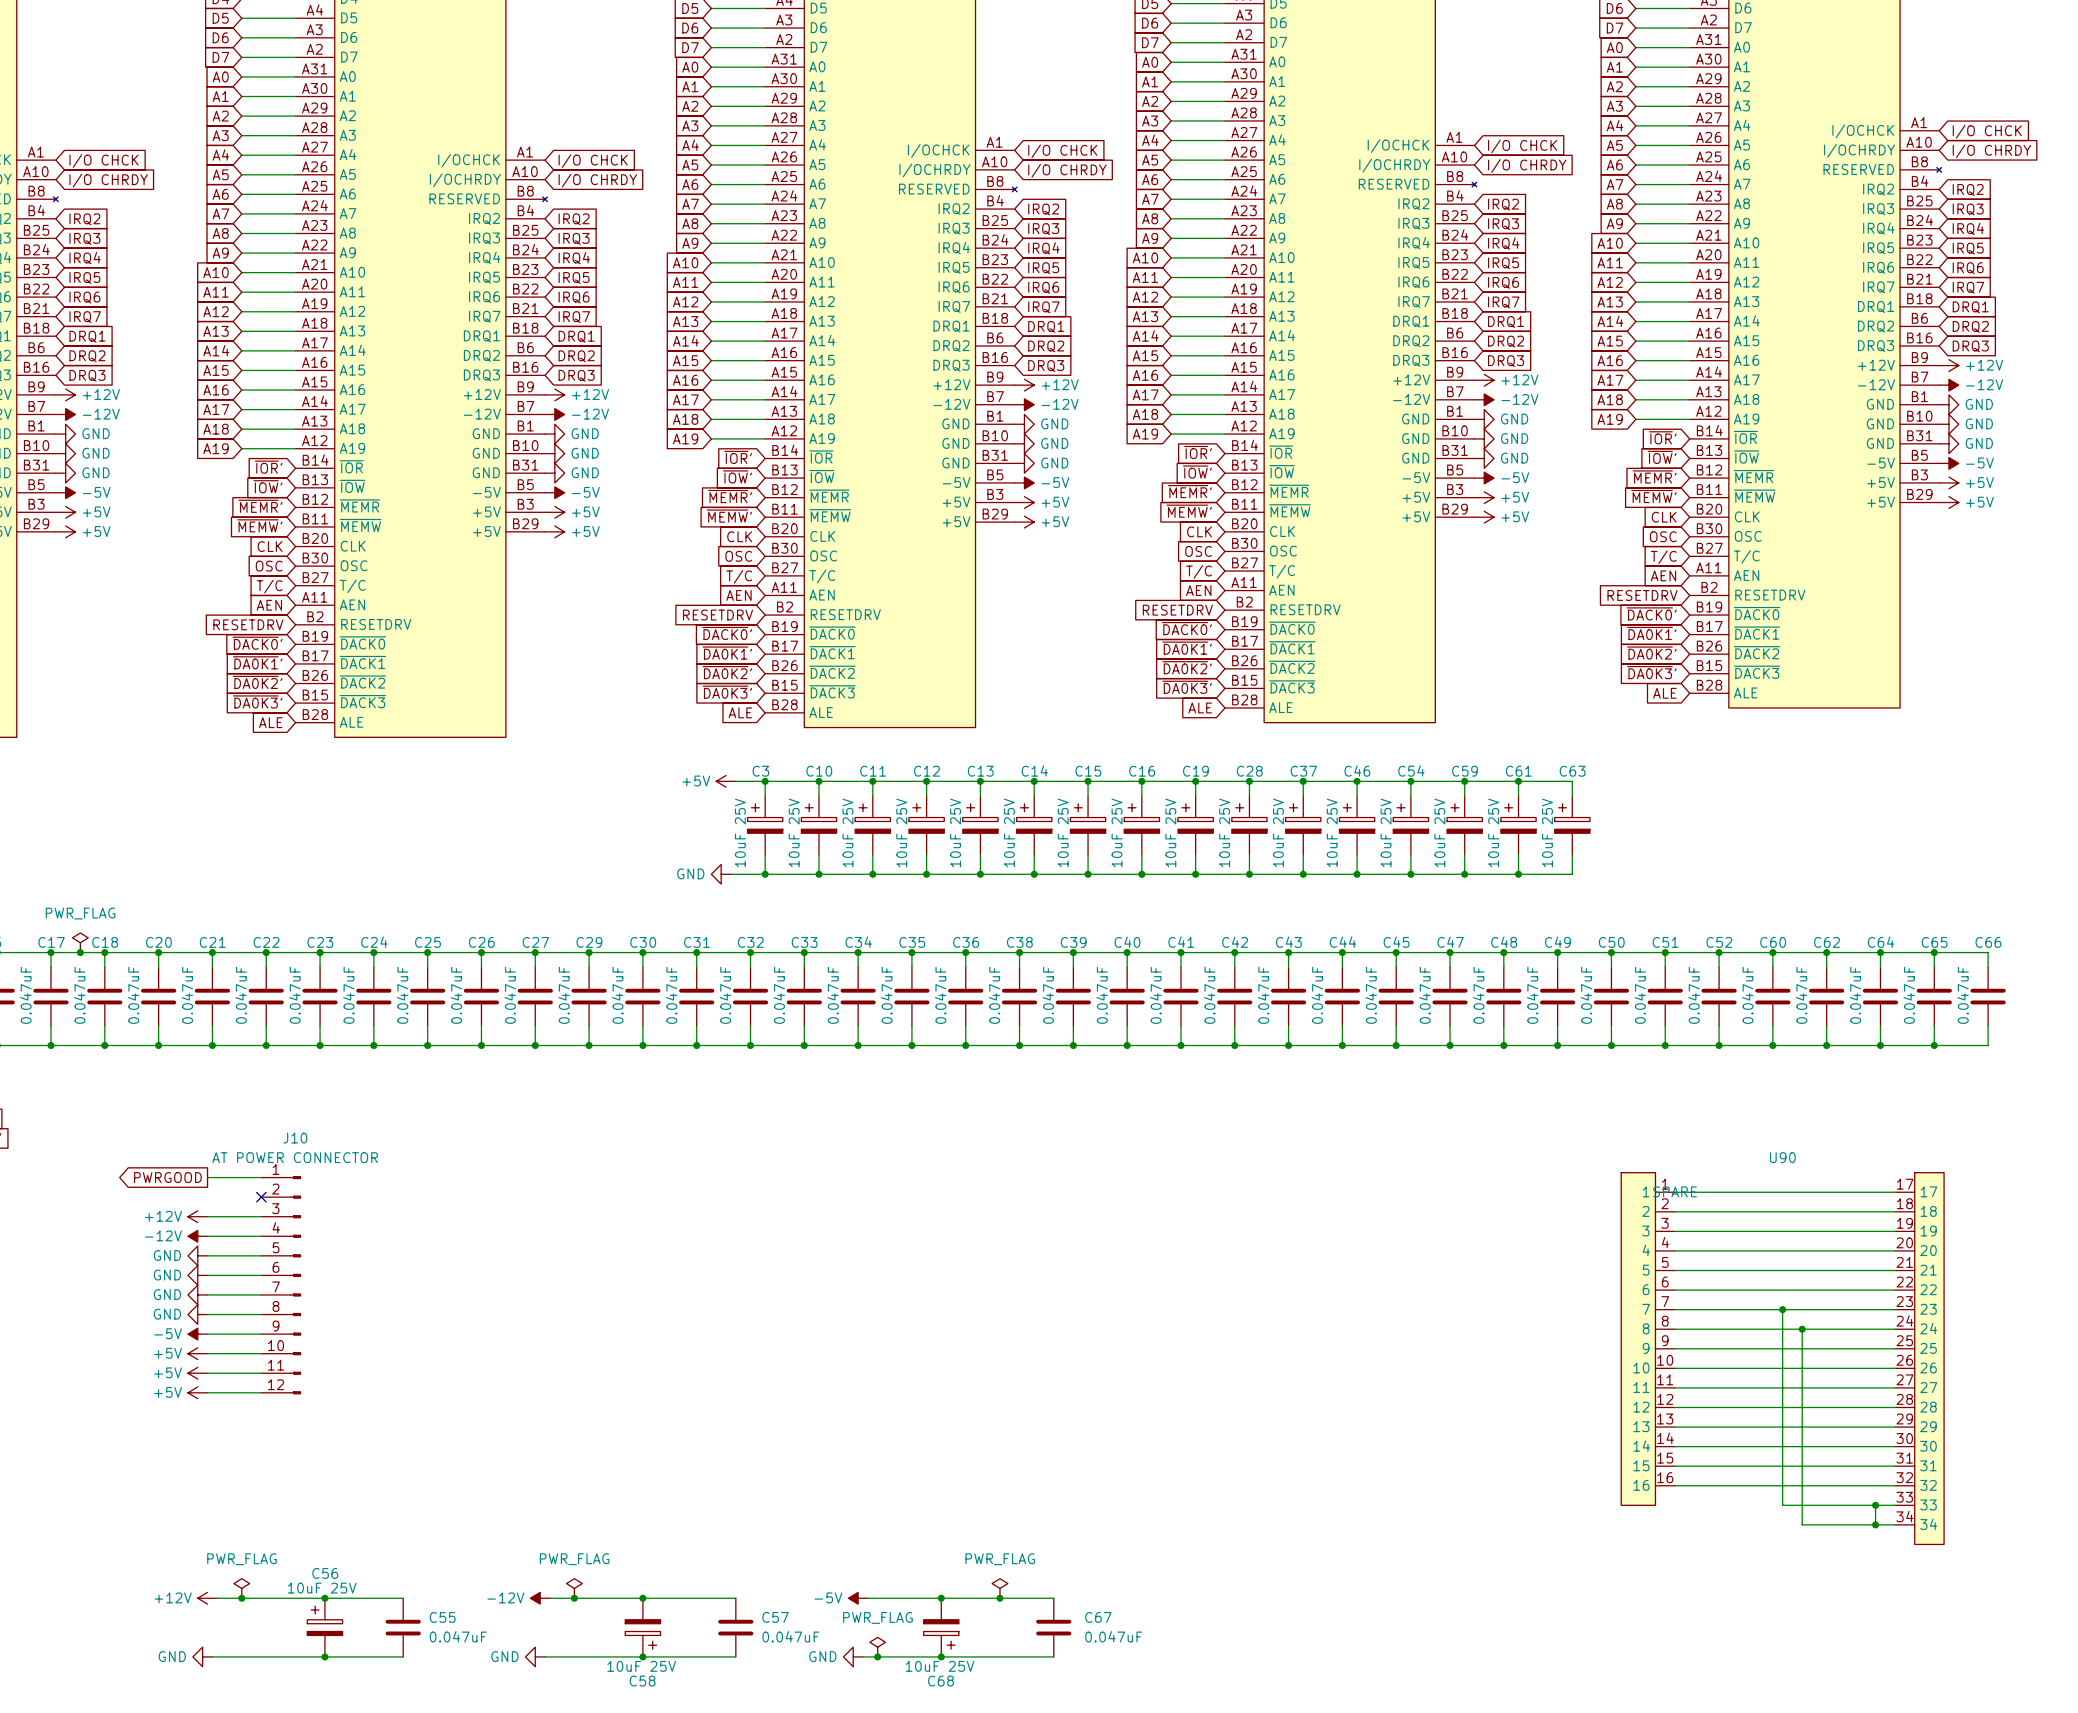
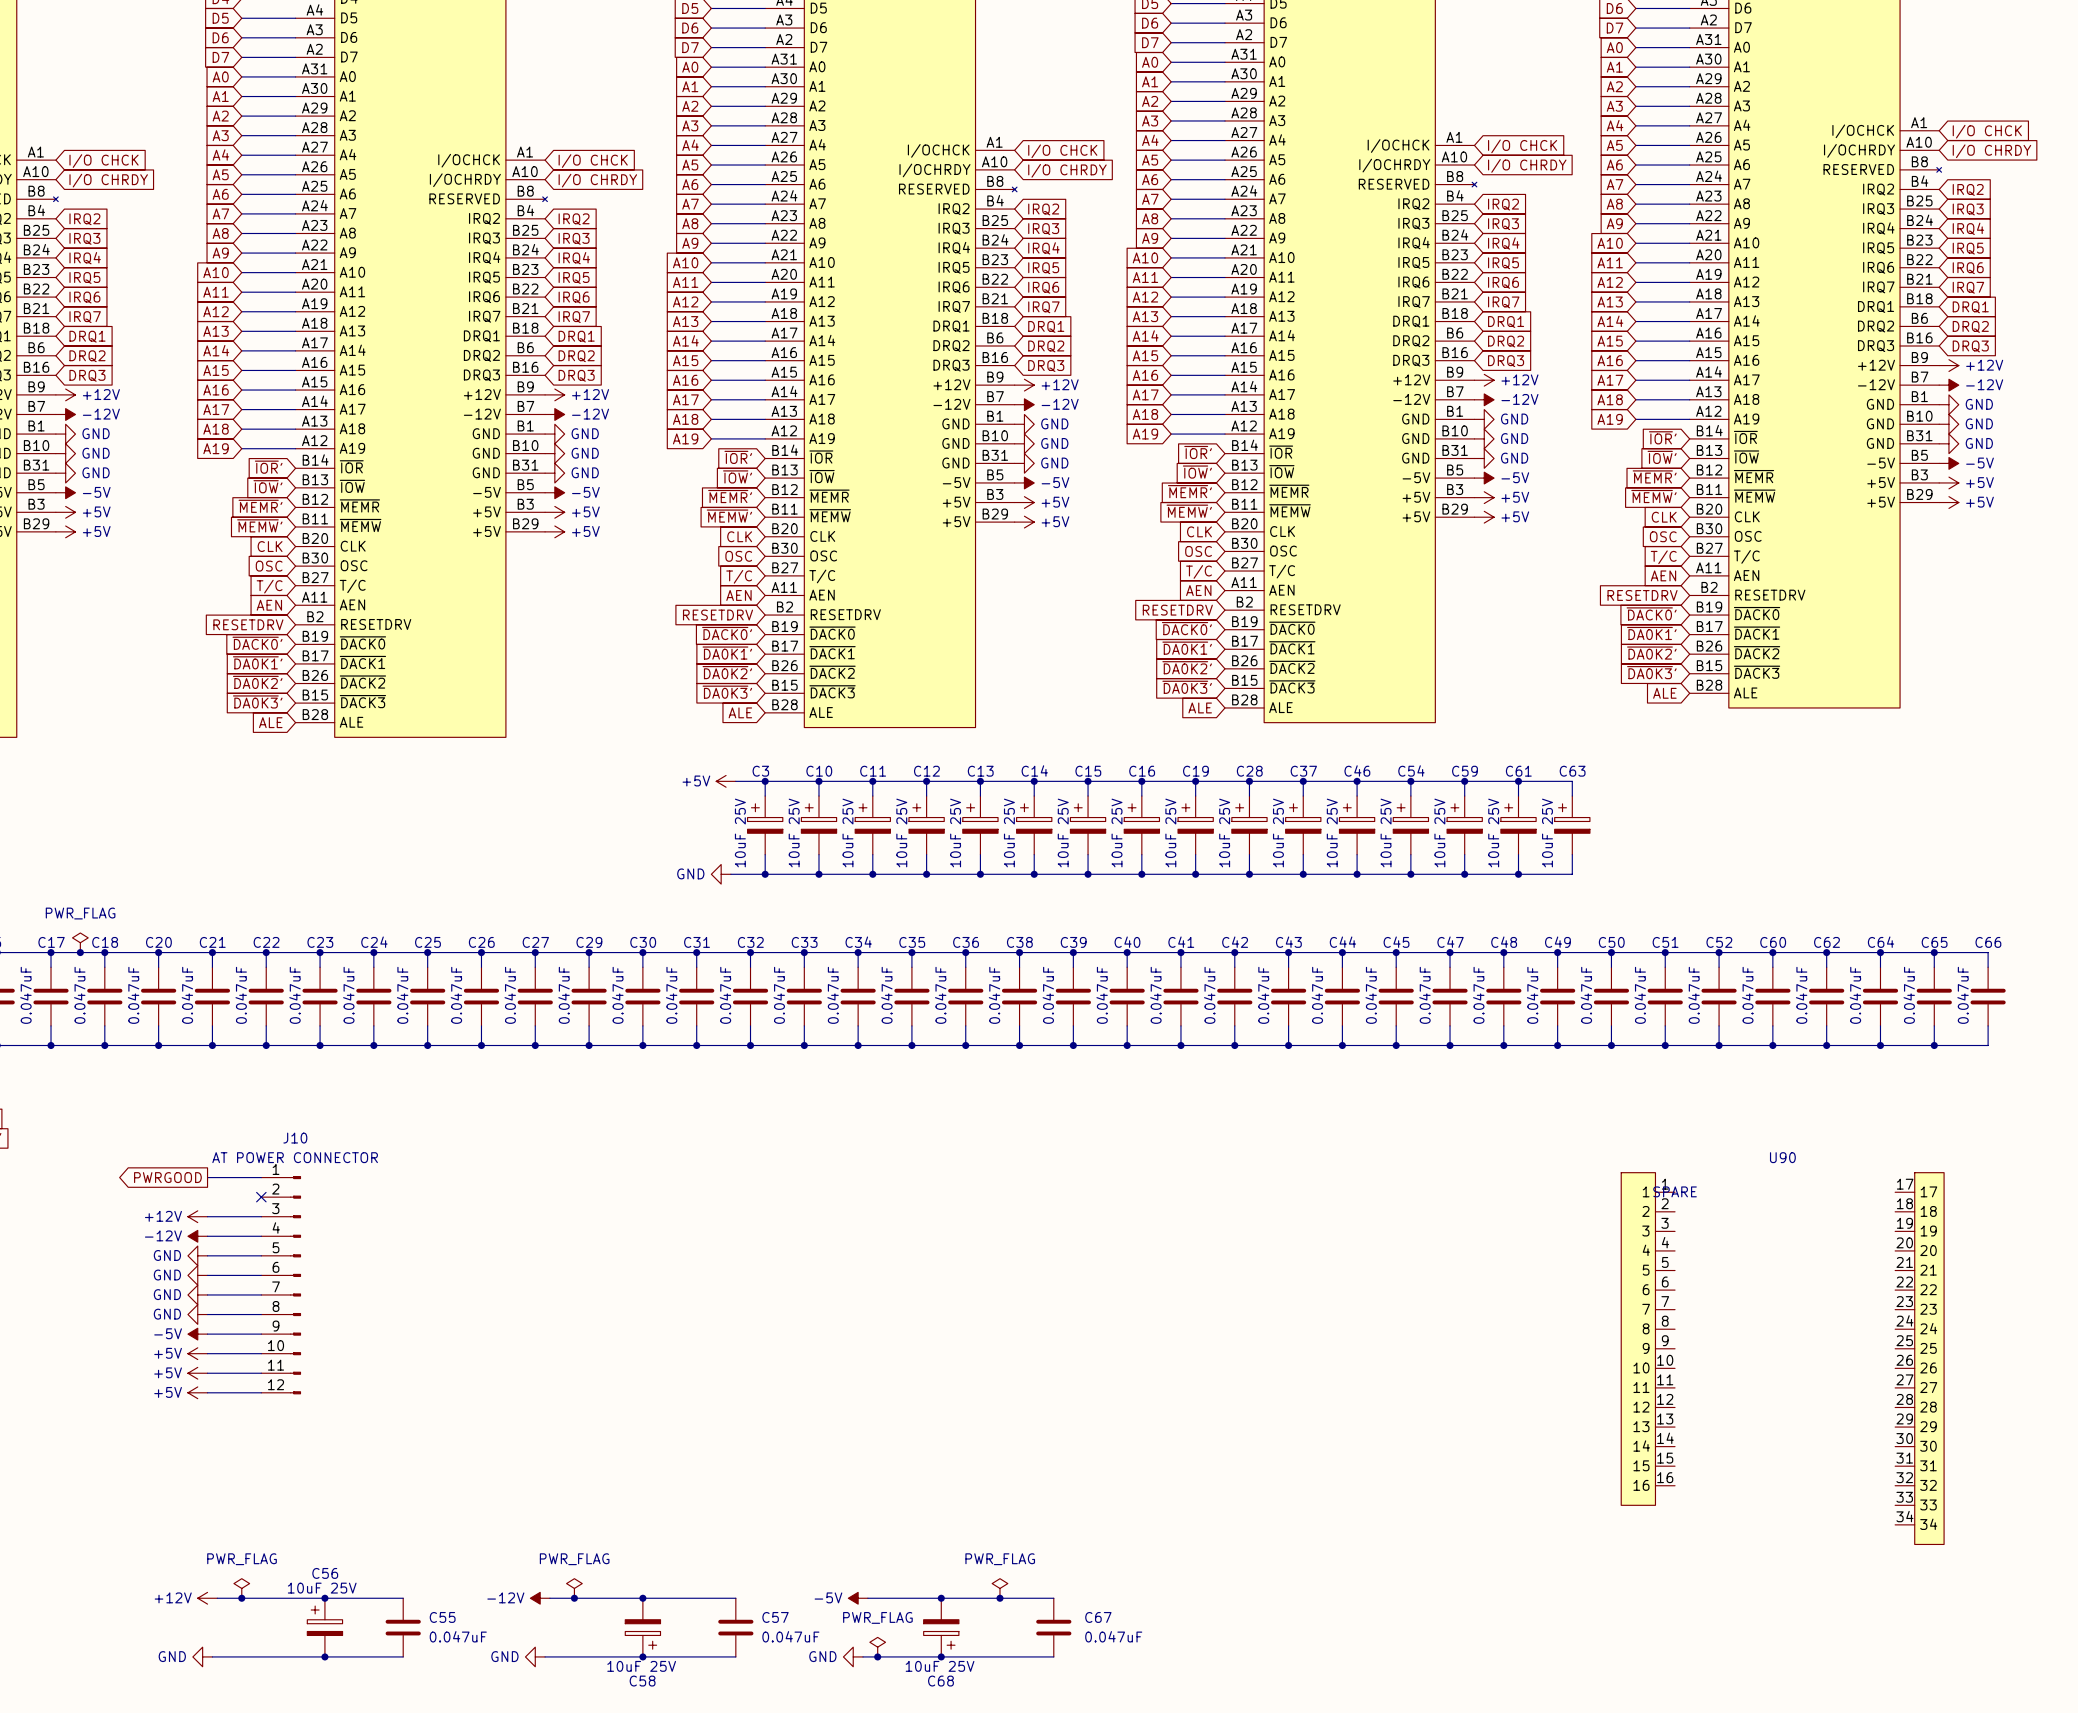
wire: (1675, 1192) (1895, 1192) -> none
wire: (1675, 1211) (1895, 1211) -> none
wire: (1675, 1231) (1895, 1231) -> none
wire: (1675, 1250) (1895, 1250) -> none
wire: (1675, 1270) (1895, 1270) -> none
wire: (1675, 1290) (1895, 1290) -> none
wire: (1675, 1309) (1895, 1309) -> none
wire: (1782, 1309) (1782, 1505) (1895, 1505) -> none
junction: (1782, 1309) -> none
wire: (1675, 1329) (1895, 1329) -> none
wire: (1802, 1329) (1802, 1524) (1895, 1524) -> none
junction: (1802, 1329) -> none
wire: (1675, 1348) (1895, 1348) -> none
wire: (1675, 1368) (1895, 1368) -> none
wire: (1675, 1387) (1895, 1387) -> none
wire: (1675, 1407) (1895, 1407) -> none
wire: (1675, 1427) (1895, 1427) -> none
wire: (1675, 1446) (1895, 1446) -> none
wire: (1675, 1466) (1895, 1466) -> none
wire: (1675, 1485) (1895, 1485) -> none
wire: (1875, 1505) (1875, 1524) -> none
junction: (1875, 1505) -> none
junction: (1875, 1524) -> none

